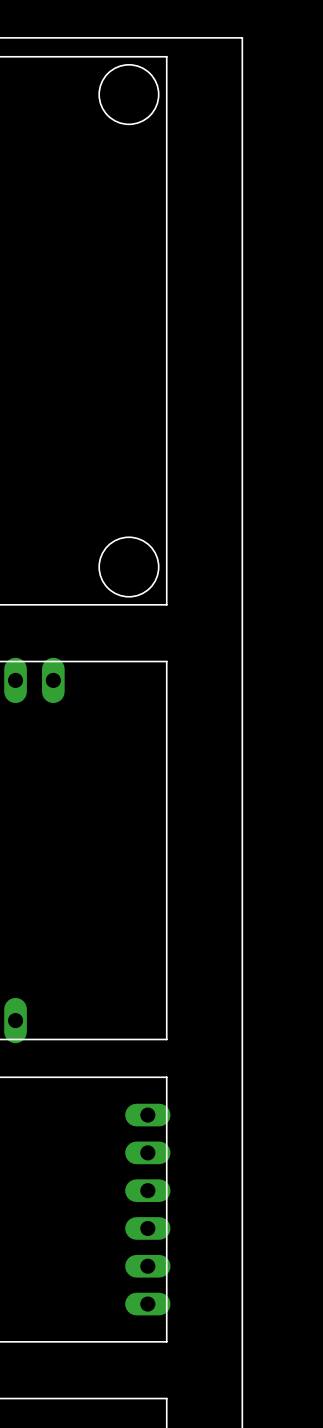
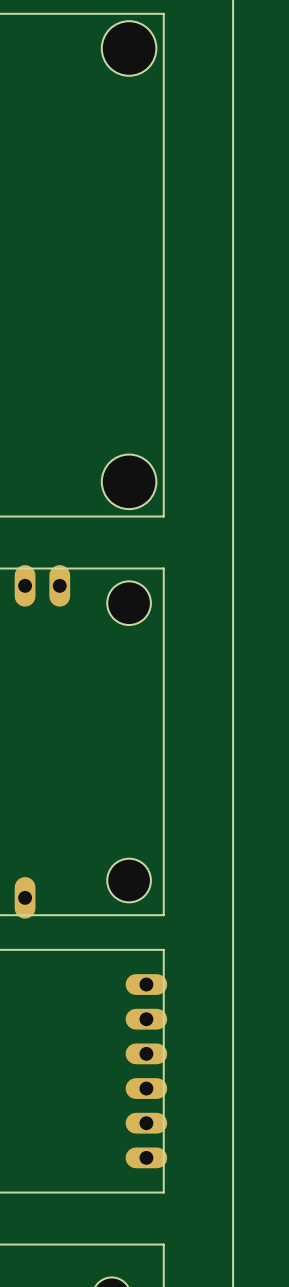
hole: none -> (129, 603)
hole: none -> (129, 880)

